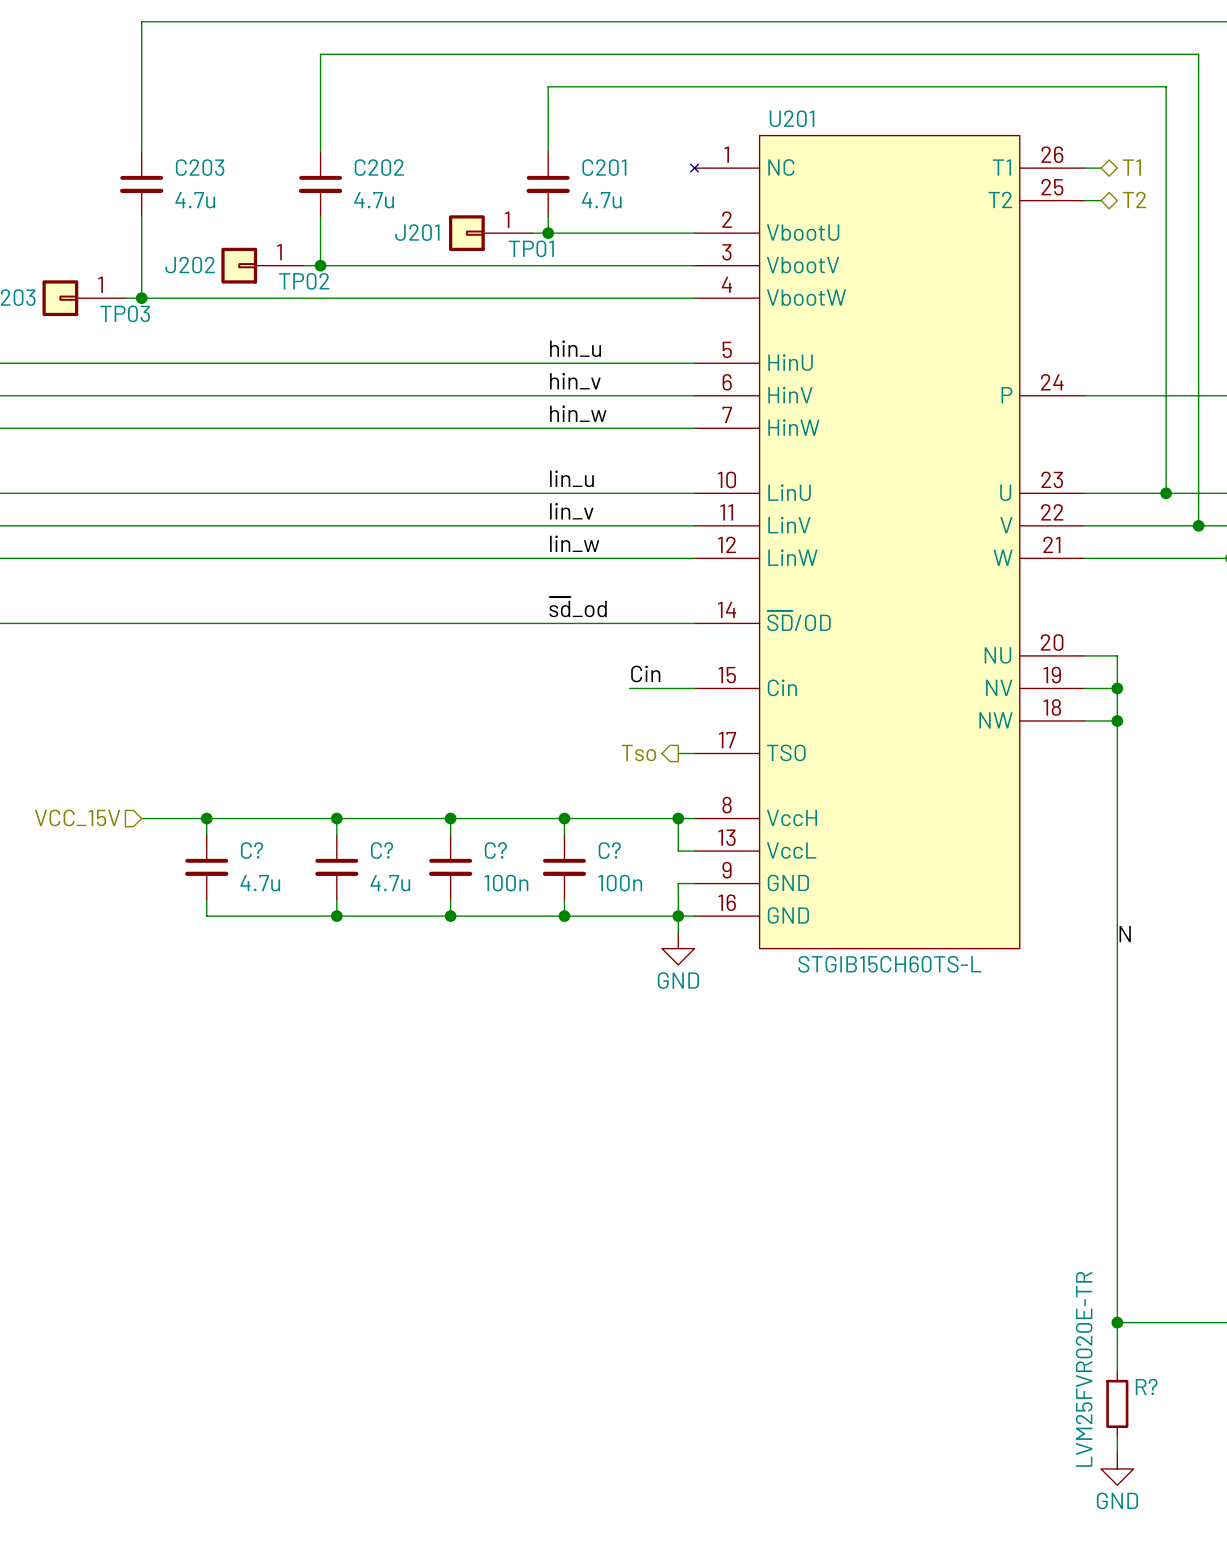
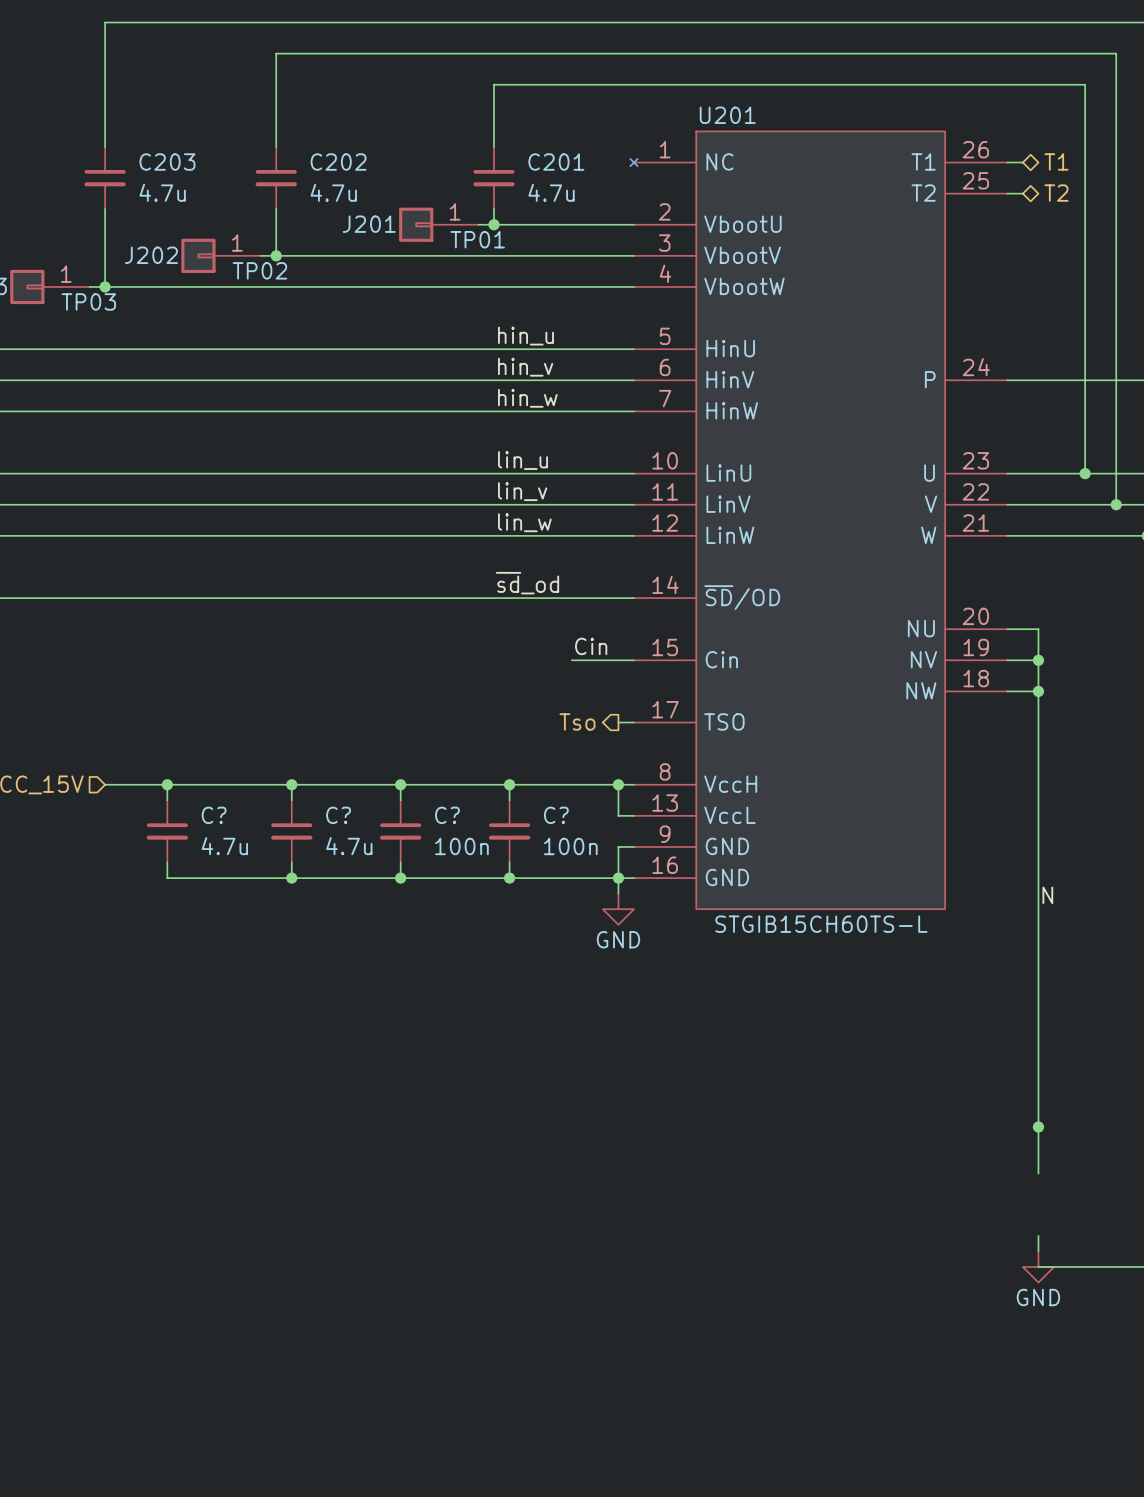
junction: none -> (1038, 1126)
wire: (1117, 1225) (1117, 1290) -> none
wire: (1117, 1306) (1117, 1371) -> none
junction: (1117, 1322) -> none
R?: LVM25FVR020E-TR (1117, 1403) -> none
wire: (1117, 1436) (1117, 1452) -> none
power symbol position: GND (1117, 1468) -> GND (1038, 1266)

